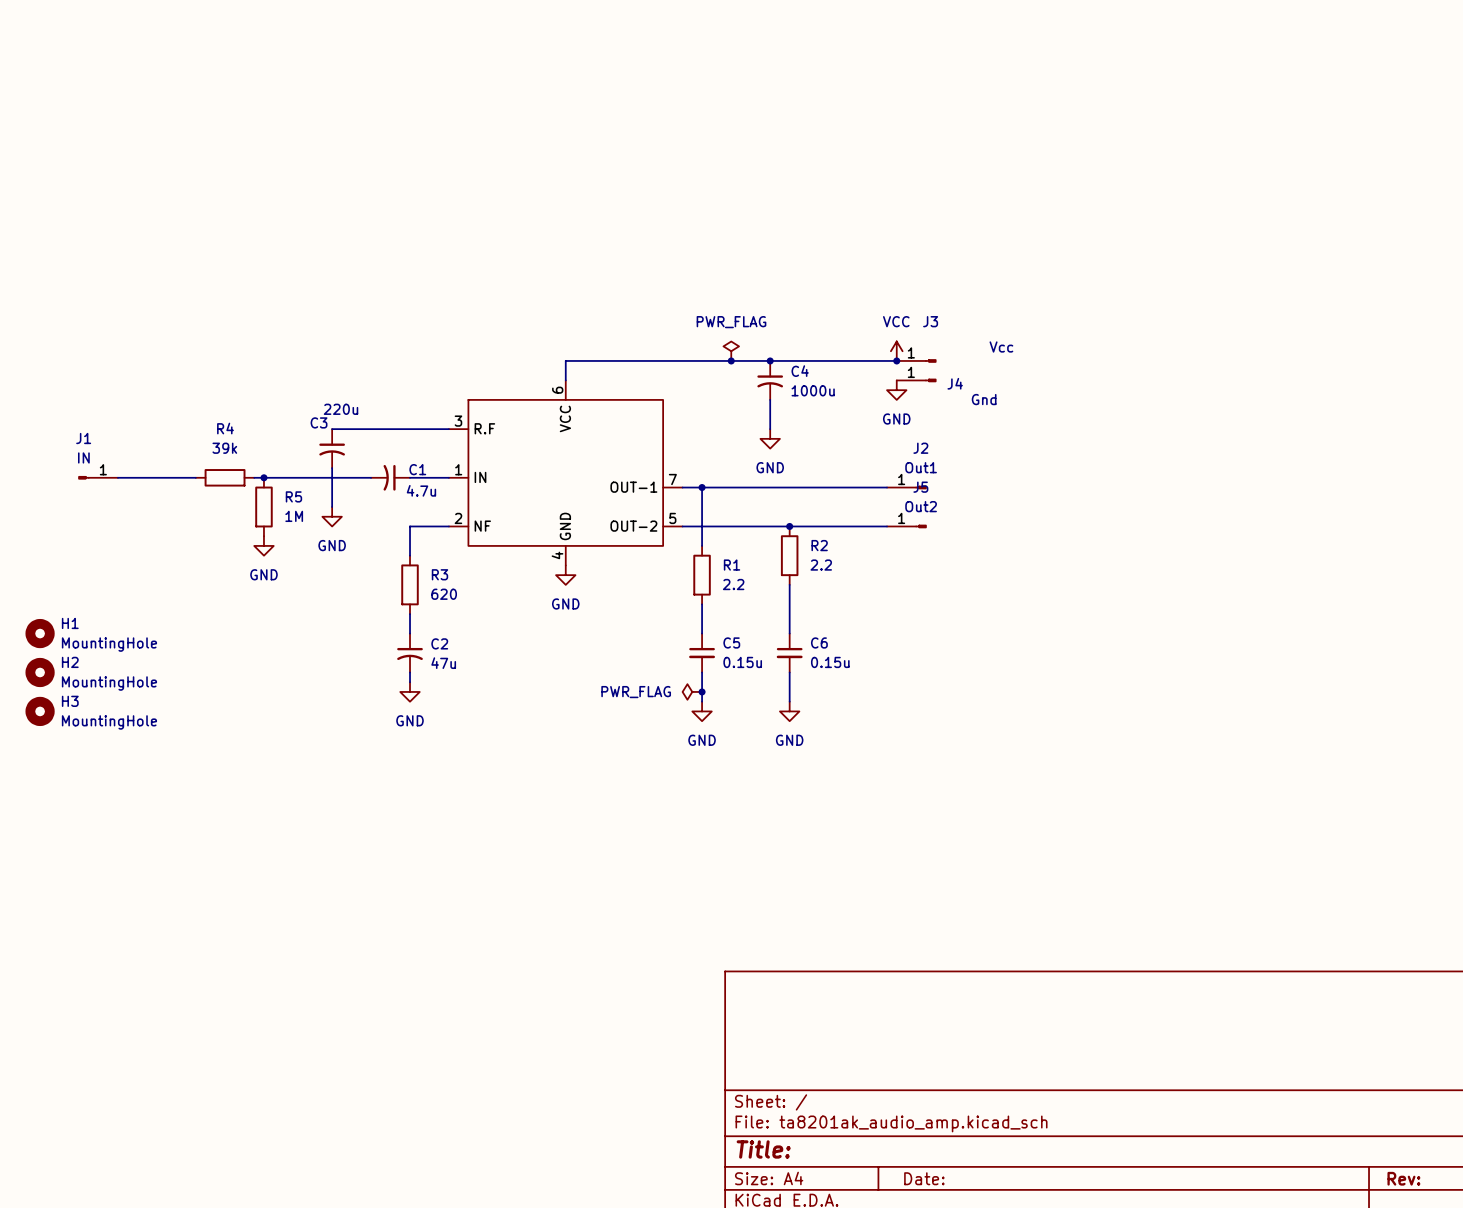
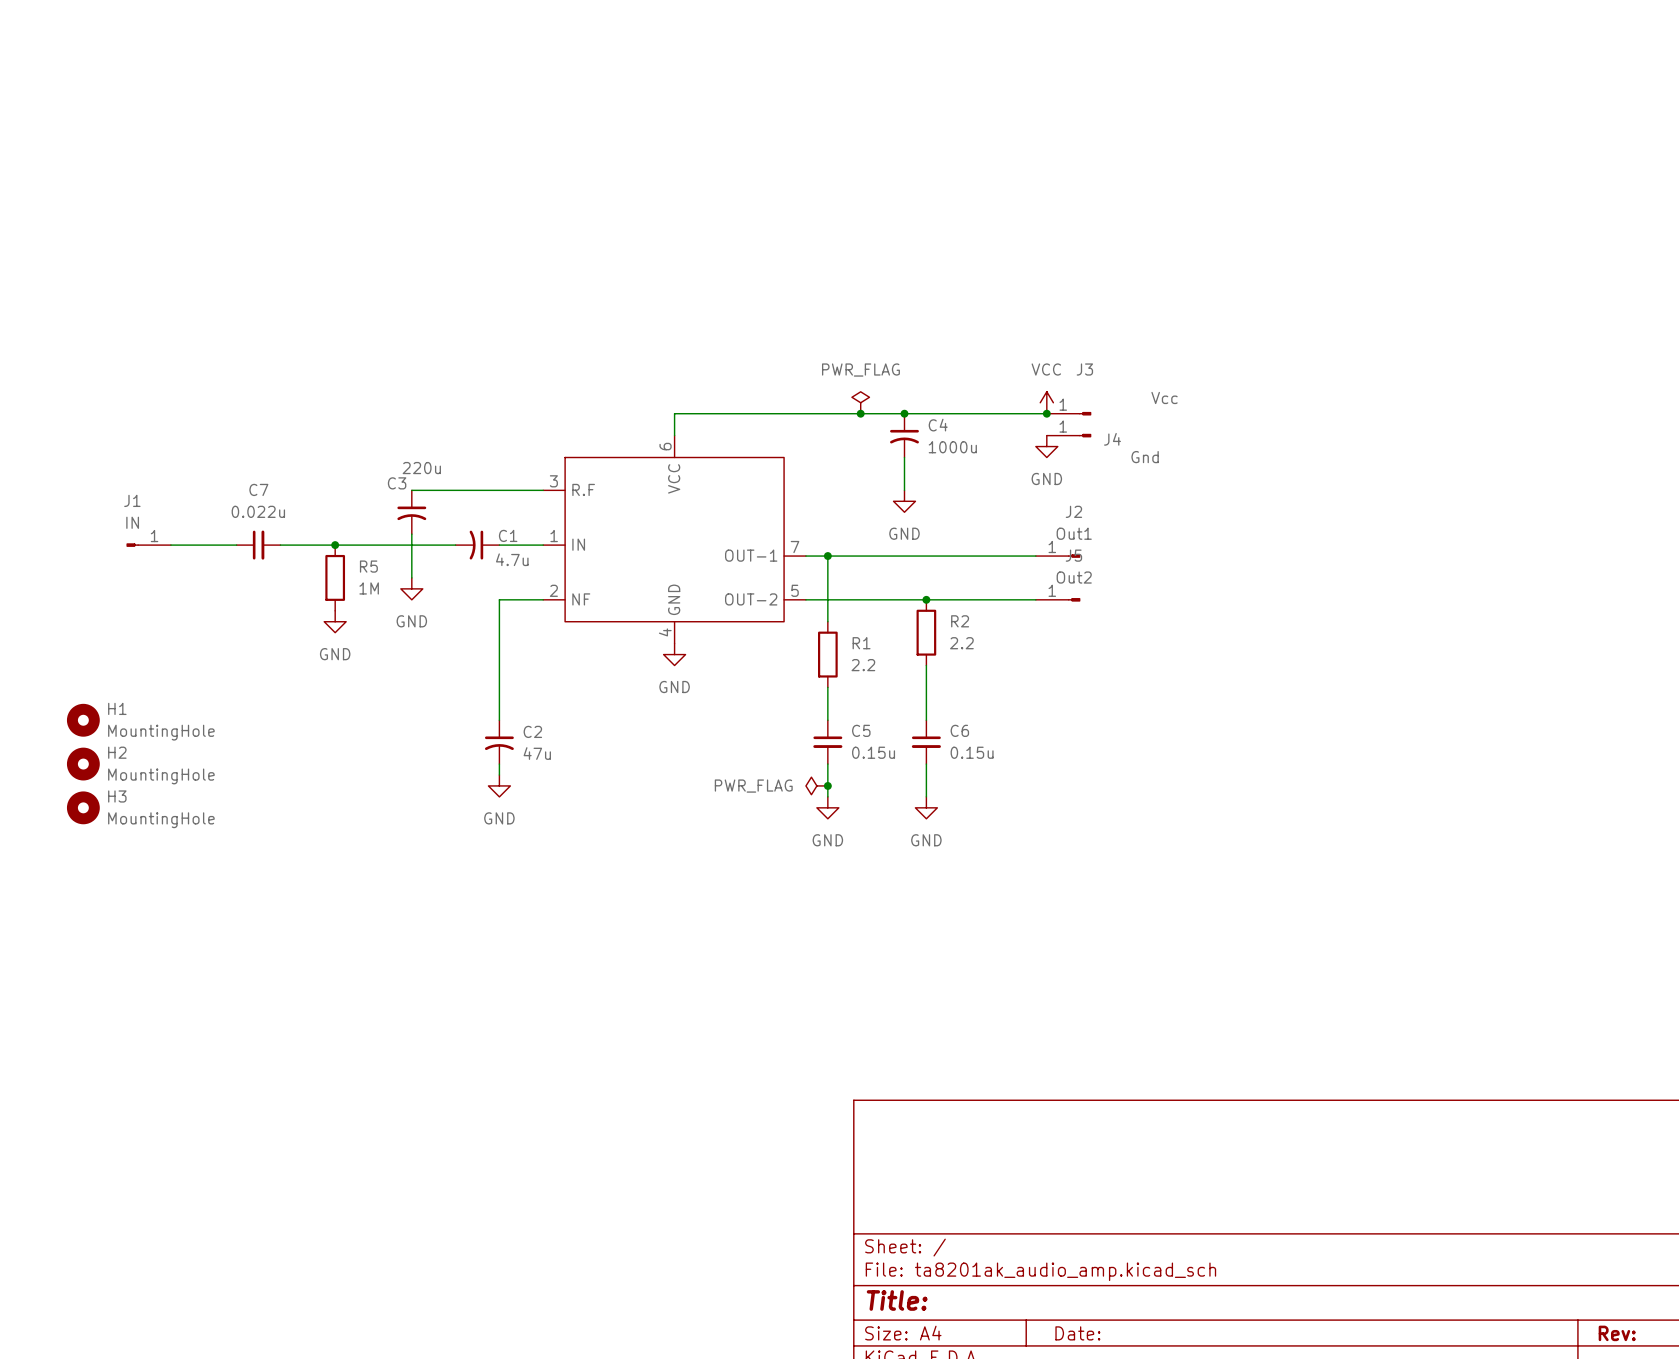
C7: none -> 0.022u (258, 545)
wire: none -> (280, 545) (324, 545)
R4: 39k (225, 477) -> none
wire: none -> (499, 632) (499, 698)
R3: 620 (410, 584) -> none

